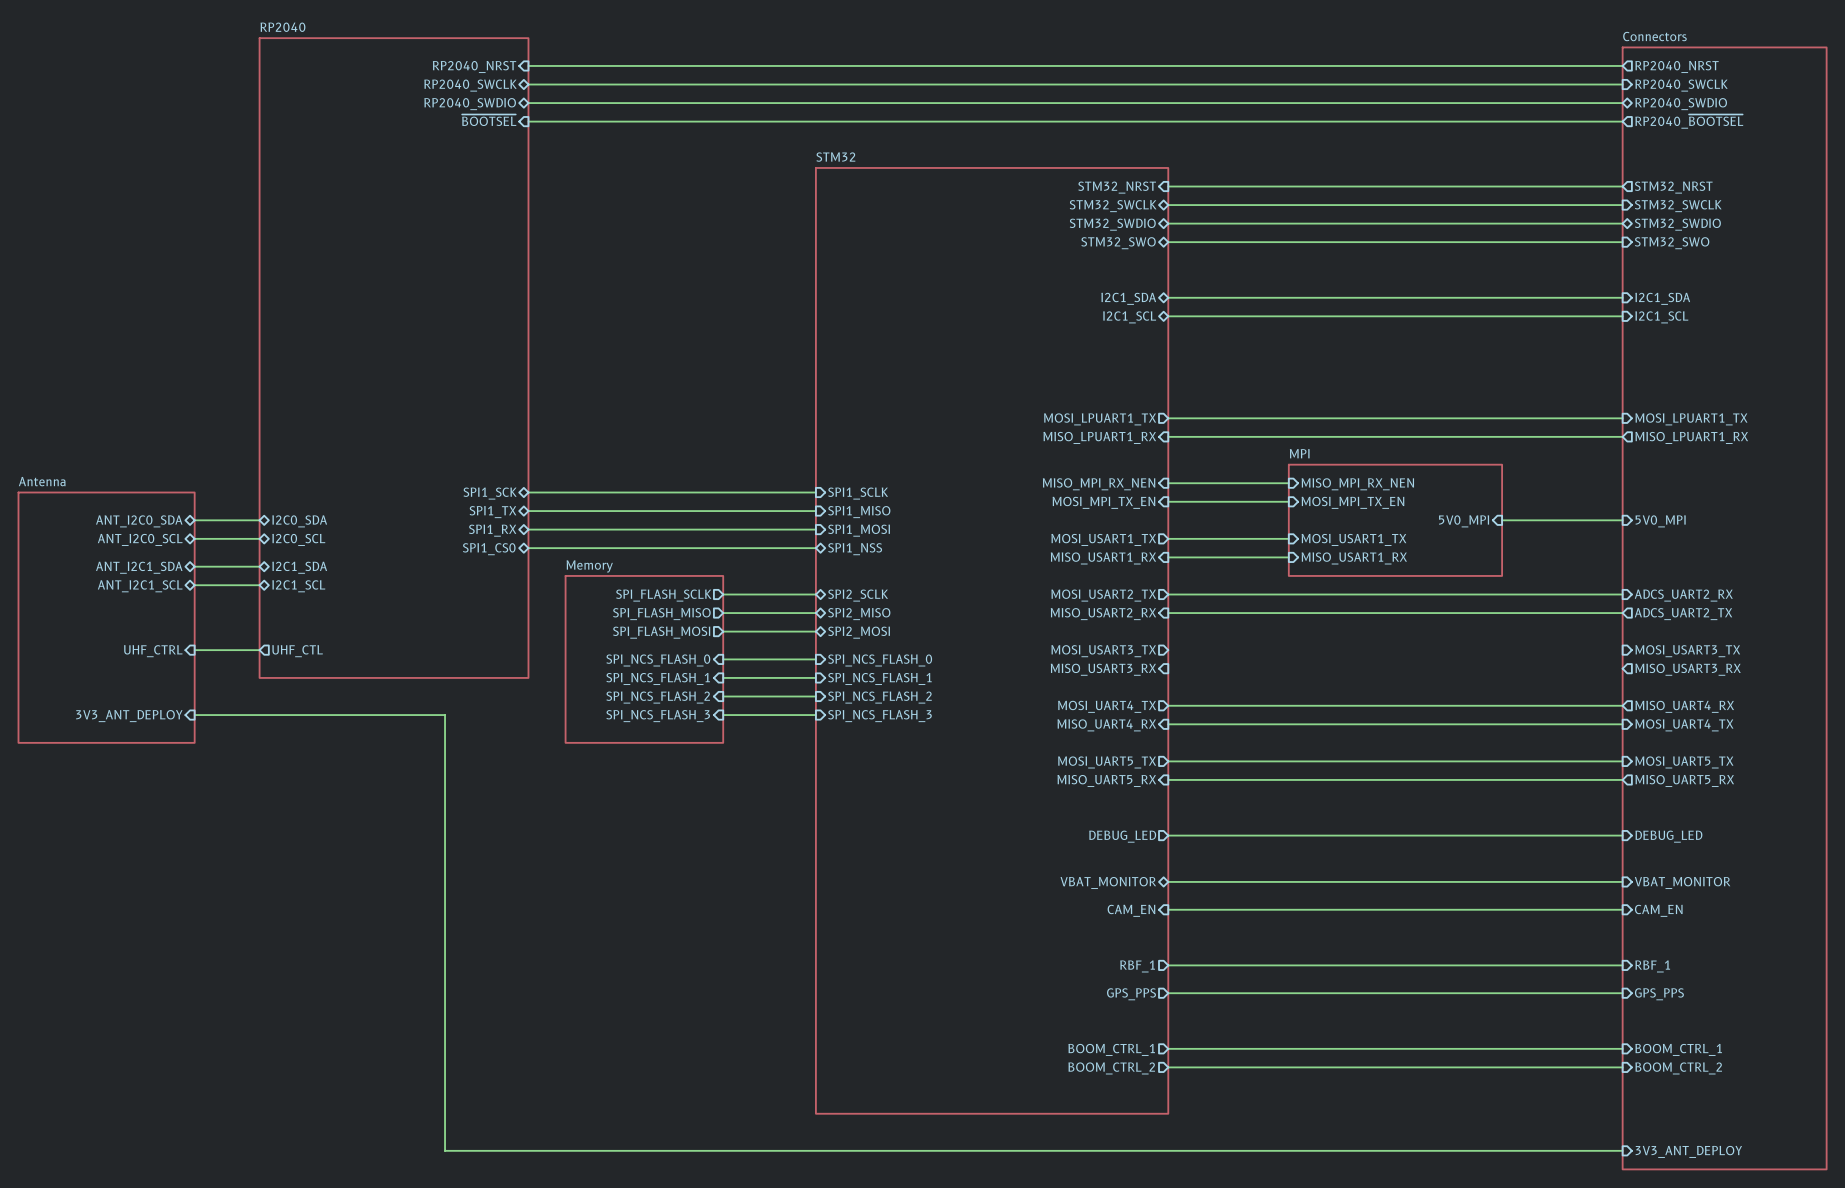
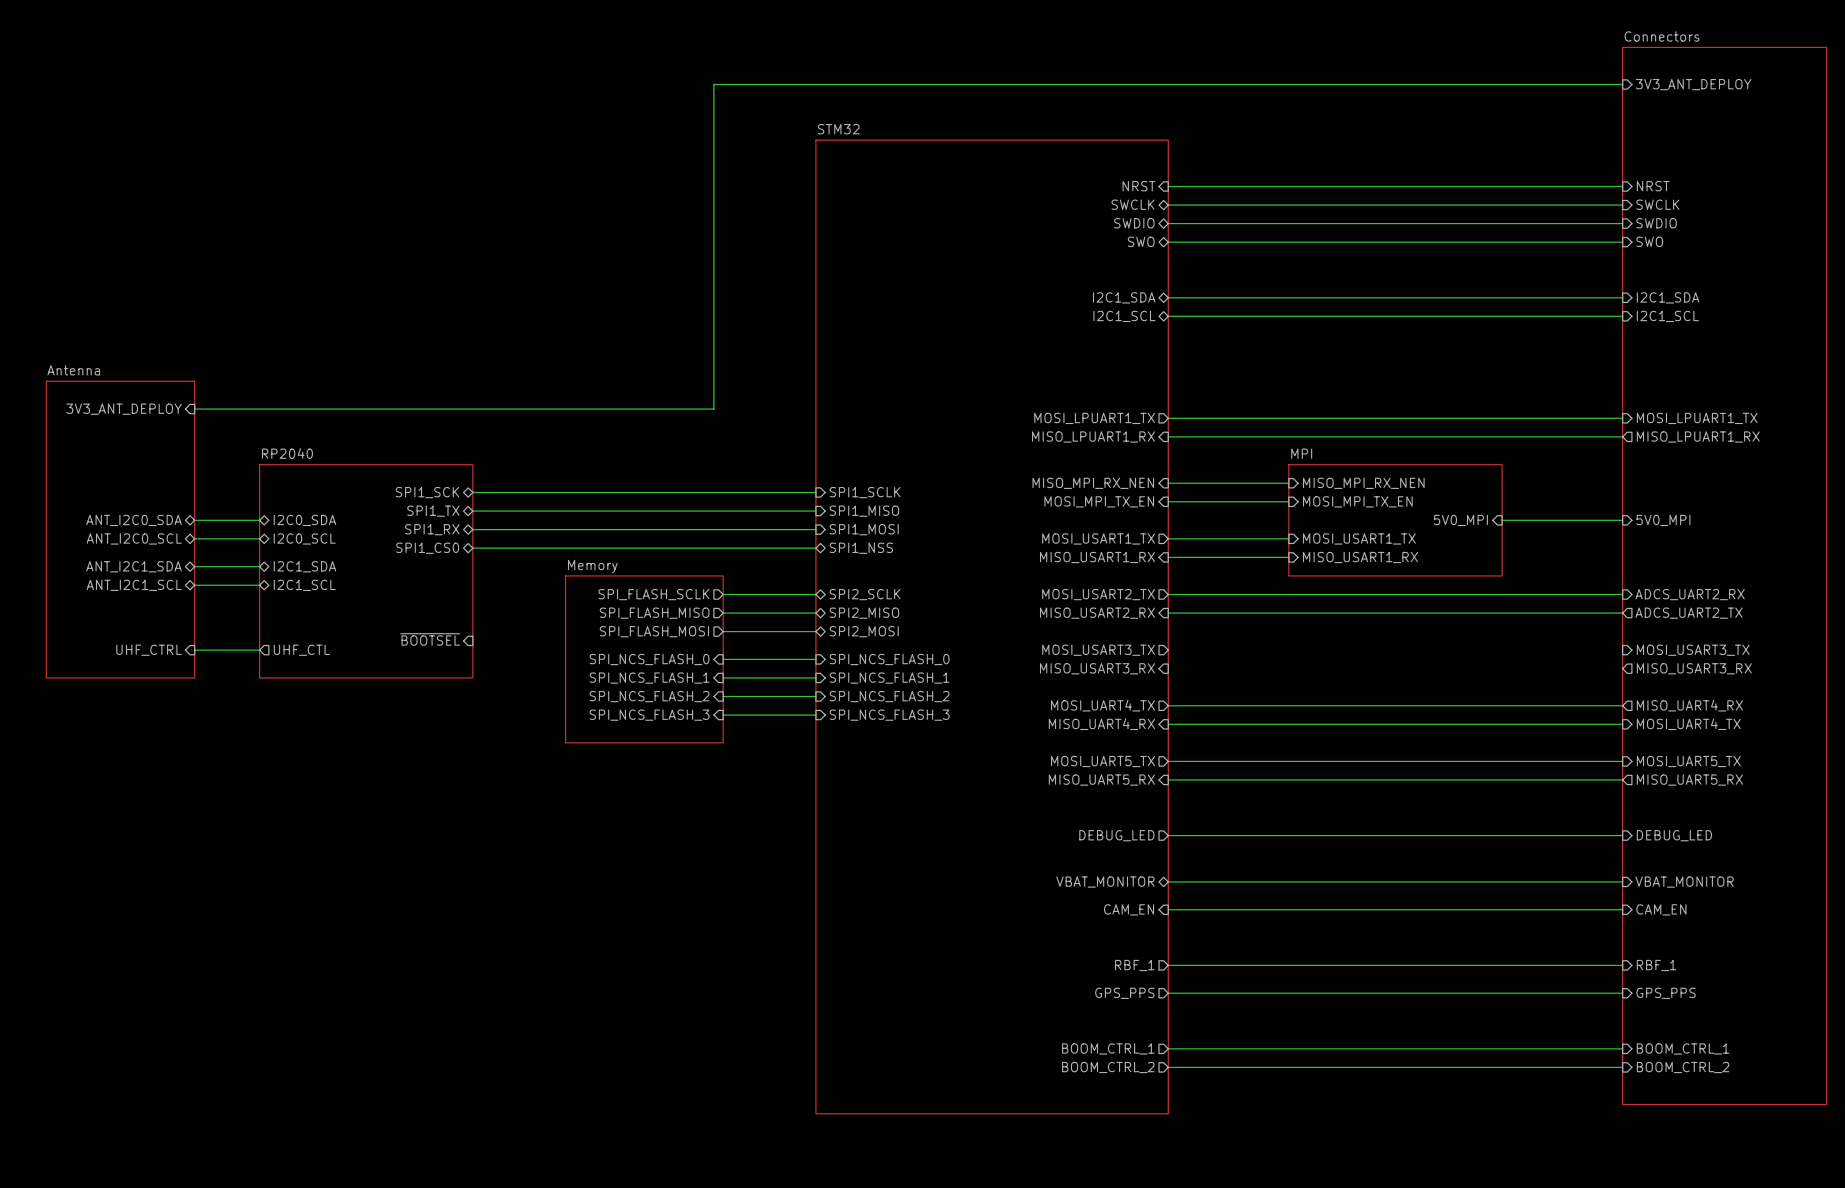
sheet RP2040 name position: RP2040 (282, 27) -> RP2040 (287, 453)
sheet RP2040 shape: [259, 37, 530, 679] -> [259, 464, 474, 679]
wire: (528, 65) (1622, 65) -> none
sheet pin: RP2040_NRST (474, 67) -> none
sheet pin: RP2040_NRST (1677, 67) -> none
wire: (528, 84) (713, 84) -> (194, 409) (713, 409) (713, 84)
sheet pin: RP2040_SWCLK (470, 85) -> none
sheet pin: RP2040_SWCLK (1681, 85) -> 3V3_ANT_DEPLOY (1693, 84)
wire: (528, 103) (1622, 103) -> none
sheet pin: RP2040_SWDIO (470, 104) -> none
sheet pin: RP2040_SWDIO (1681, 104) -> none
sheet pin: ~{BOOTSEL} (489, 120) -> none
wire: (528, 121) (1622, 121) -> none
sheet pin: RP2040_~{BOOTSEL} (1689, 121) -> none
sheet STM32 shape: [815, 167, 1169, 1115] -> [815, 139, 1169, 1115]
sheet pin: STM32_NRST (1117, 187) -> NRST (1138, 186)
sheet pin shape: output (1673, 187) -> input (1653, 186)
sheet pin: STM32_NRST (1673, 187) -> NRST (1653, 186)
sheet pin: STM32_SWCLK (1113, 206) -> SWCLK (1133, 204)
sheet pin: STM32_SWCLK (1678, 206) -> SWCLK (1657, 204)
sheet pin: STM32_SWDIO (1112, 224) -> SWDIO (1134, 223)
sheet pin shape: bidirectional (1677, 224) -> input (1656, 223)
sheet pin: STM32_SWDIO (1677, 224) -> SWDIO (1656, 223)
sheet pin: STM32_SWO (1118, 243) -> SWO (1141, 241)
sheet pin: STM32_SWO (1672, 243) -> SWO (1649, 241)
sheet pin: none -> 3V3_ANT_DEPLOY (124, 409)
wire: none -> (472, 492) (528, 492)
sheet pin position: SPI1_SCK (490, 493) -> SPI1_SCK (427, 492)
wire: none -> (472, 511) (528, 511)
sheet pin position: SPI1_TX (492, 512) -> SPI1_TX (433, 511)
sheet Antenna: none -> (120, 529)
wire: none -> (472, 529) (528, 529)
sheet pin position: SPI1_RX (492, 530) -> SPI1_RX (432, 529)
wire: none -> (472, 548) (528, 548)
sheet pin position: SPI1_CS0 (489, 549) -> SPI1_CS0 (427, 548)
sheet Connectors: none -> (1724, 575)
sheet Connectors: (1724, 608) -> none
sheet Antenna: (106, 617) -> none
sheet pin: none -> ~{BOOTSEL} (430, 639)
wire: (194, 715) (445, 715) (445, 1150) (1622, 1150) -> none
sheet pin: 3V3_ANT_DEPLOY (129, 716) -> none
sheet pin: 3V3_ANT_DEPLOY (1688, 1151) -> none

